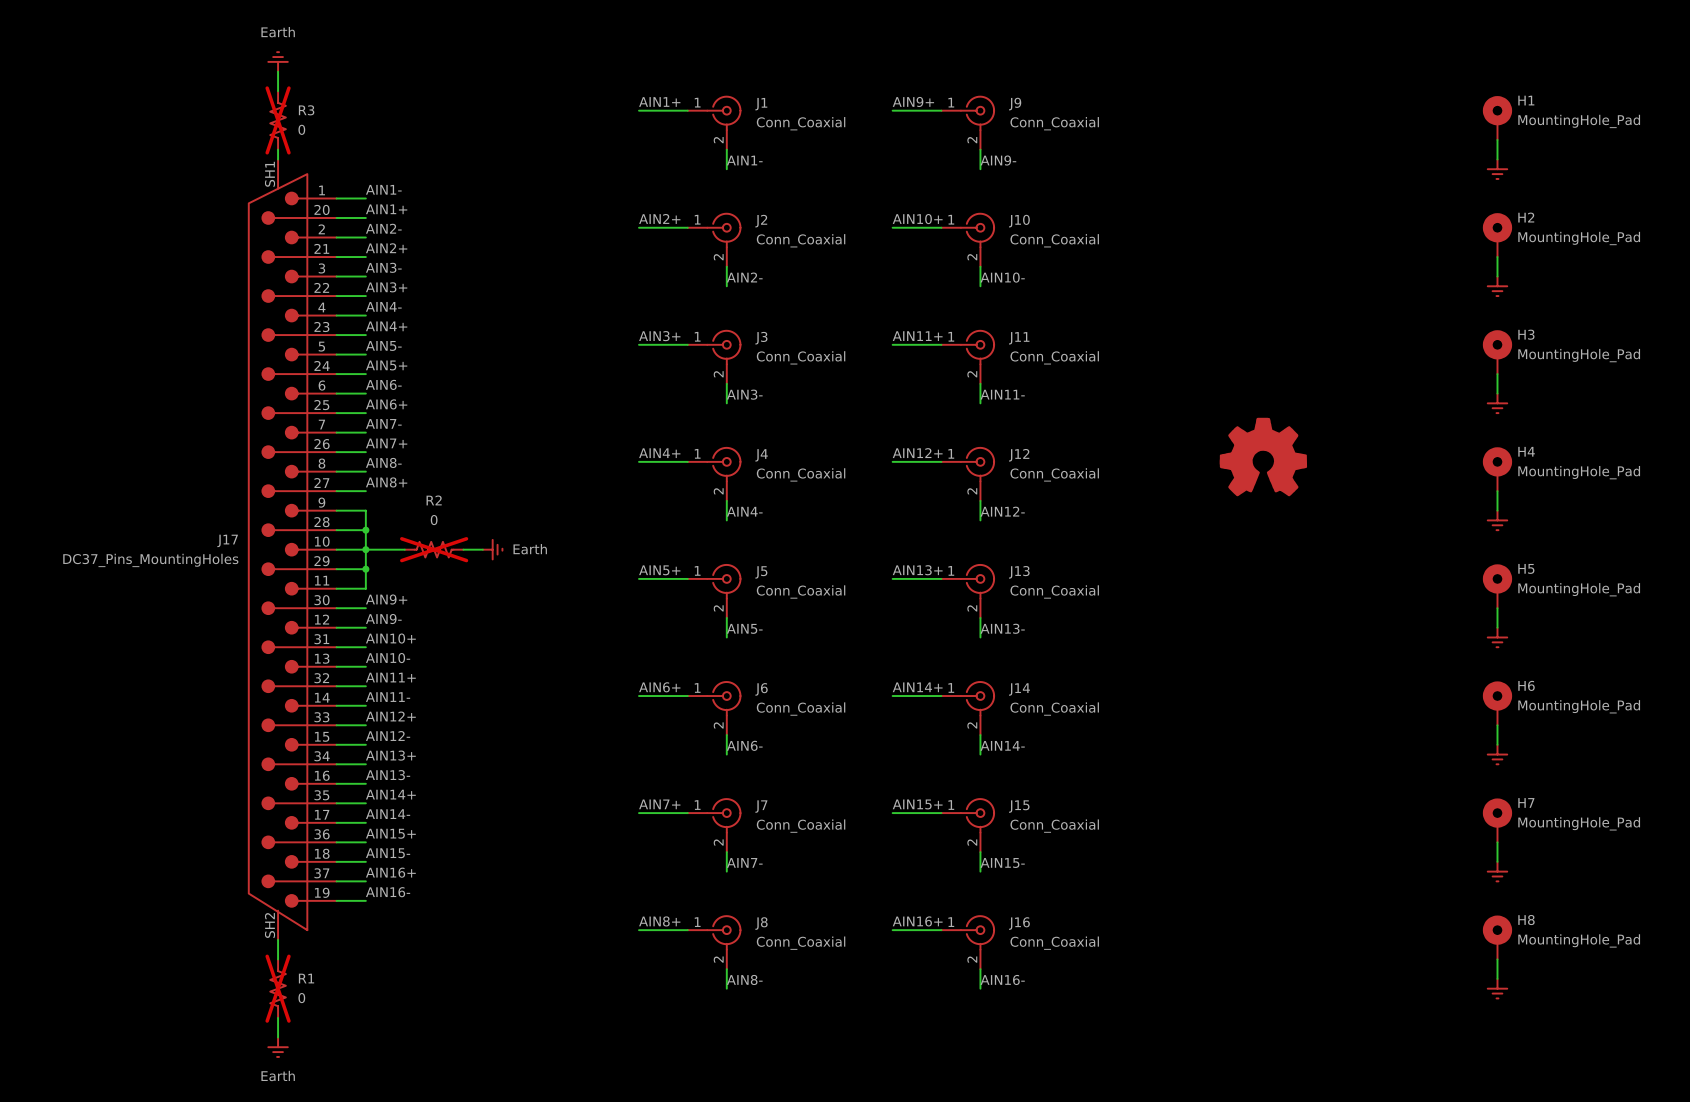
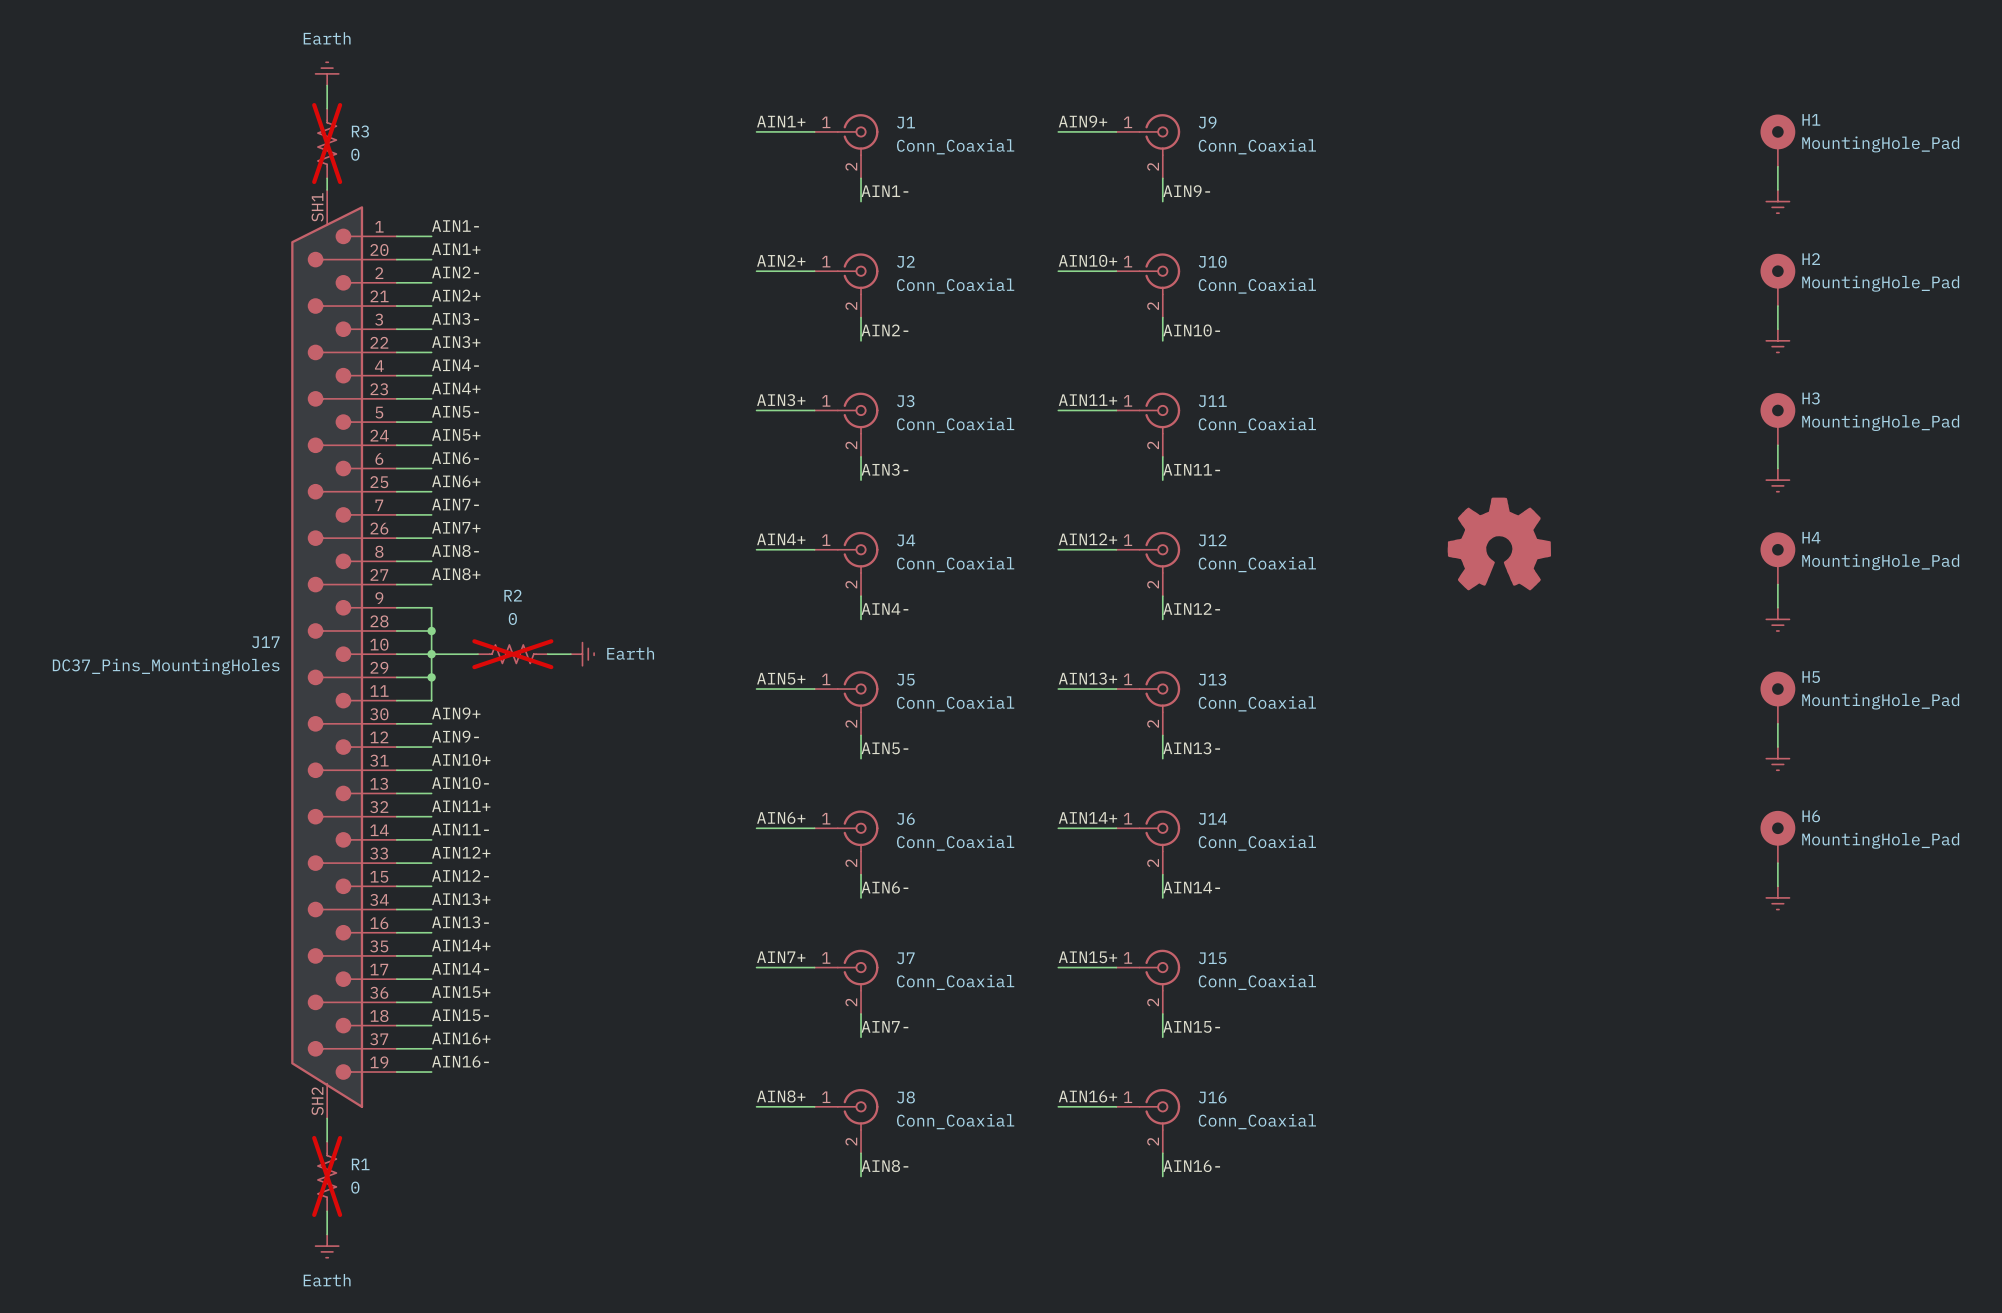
H7: MountingHole_Pad (1497, 820) -> none
wire: (1497, 842) (1497, 861) -> none
power symbol: (1497, 871) -> none
H8: MountingHole_Pad (1497, 937) -> none
wire: (1497, 959) (1497, 978) -> none
power symbol: (1497, 988) -> none

